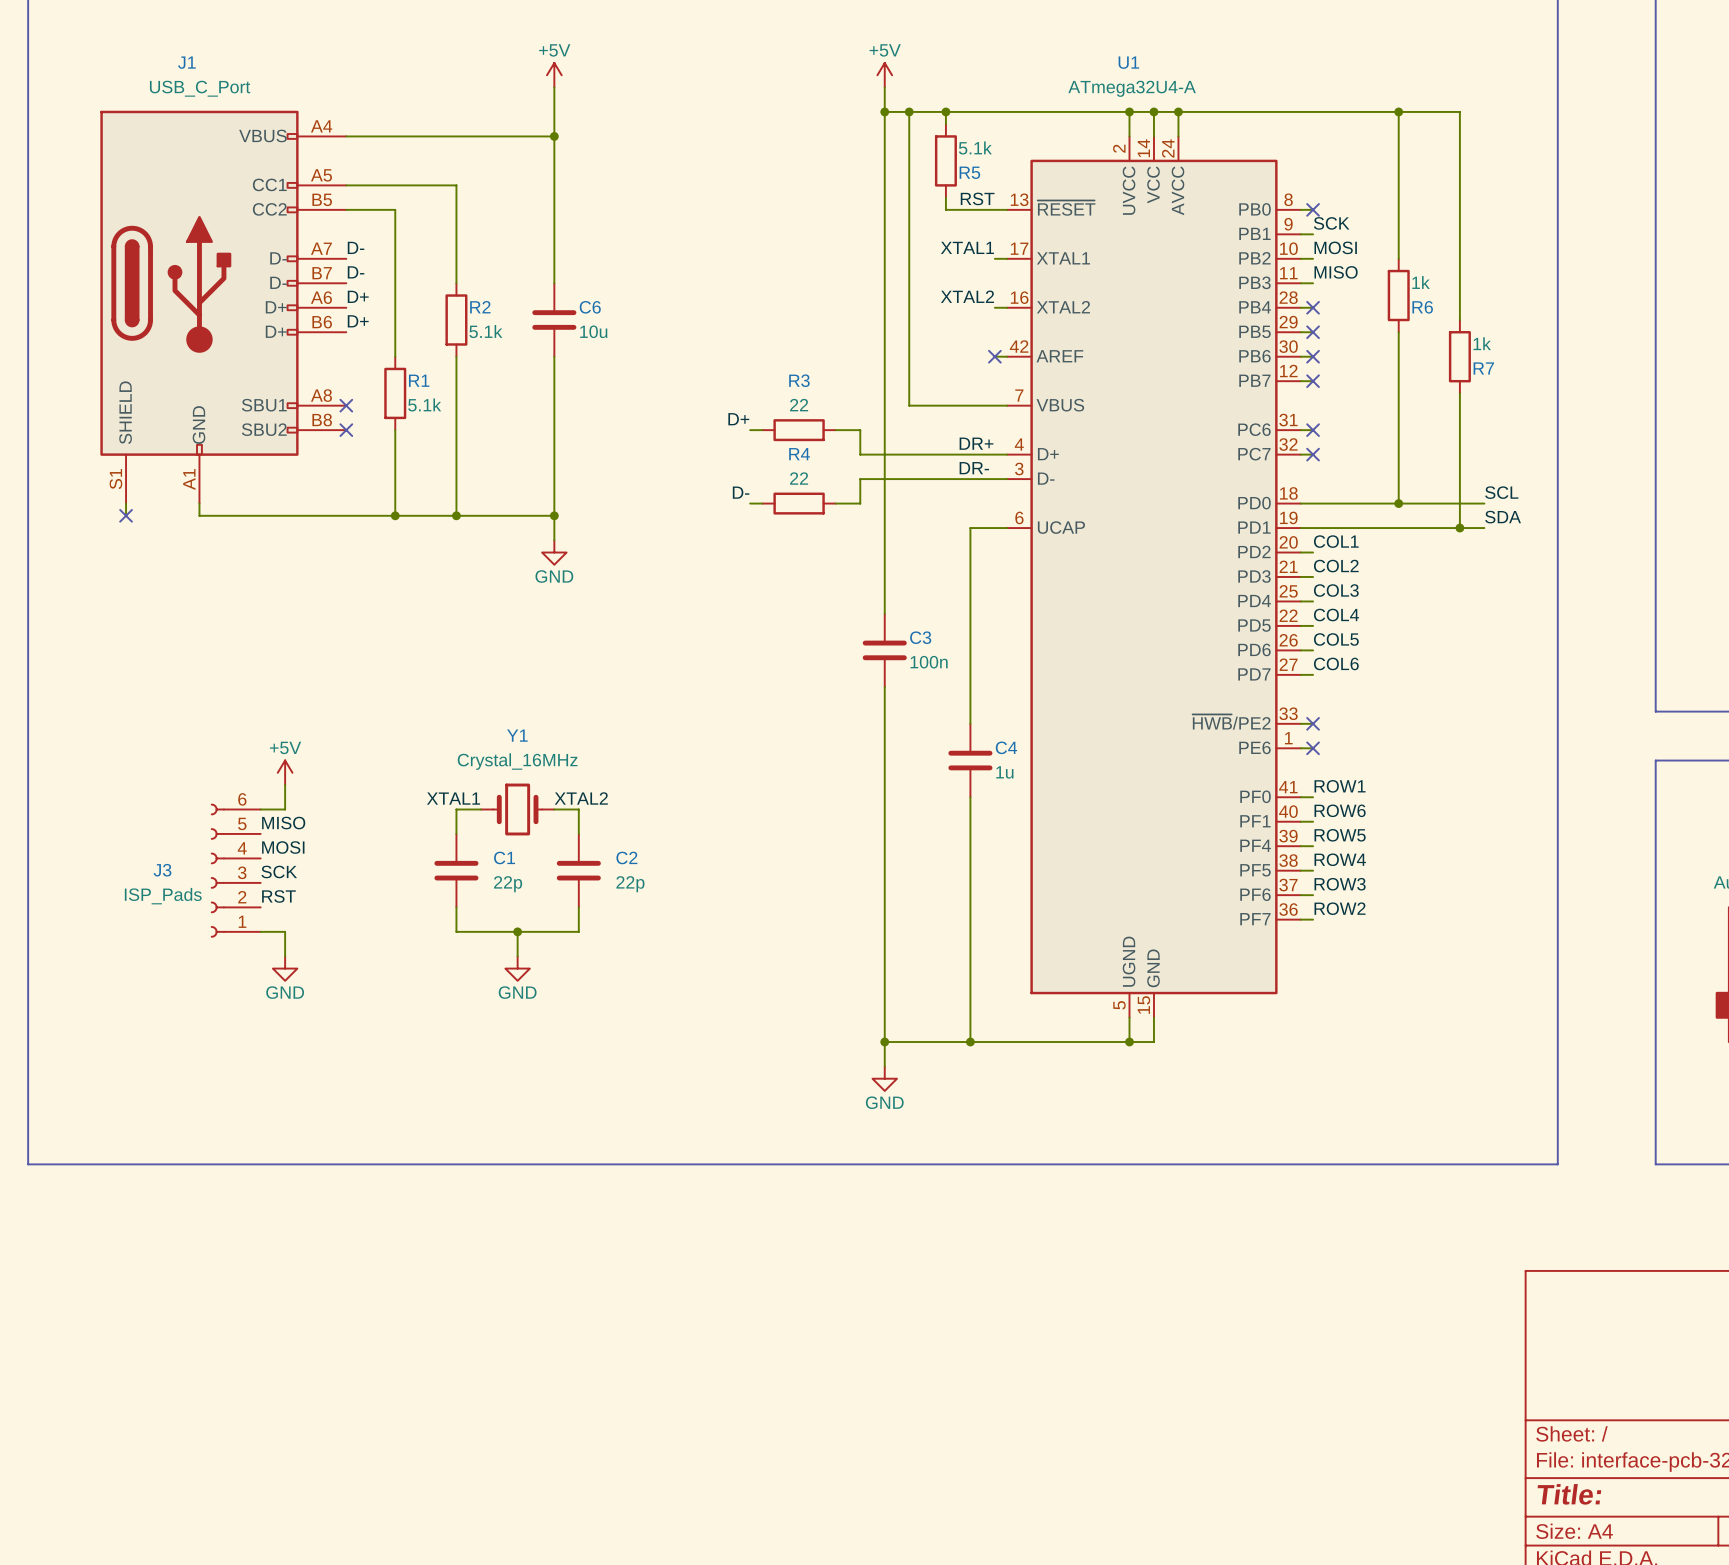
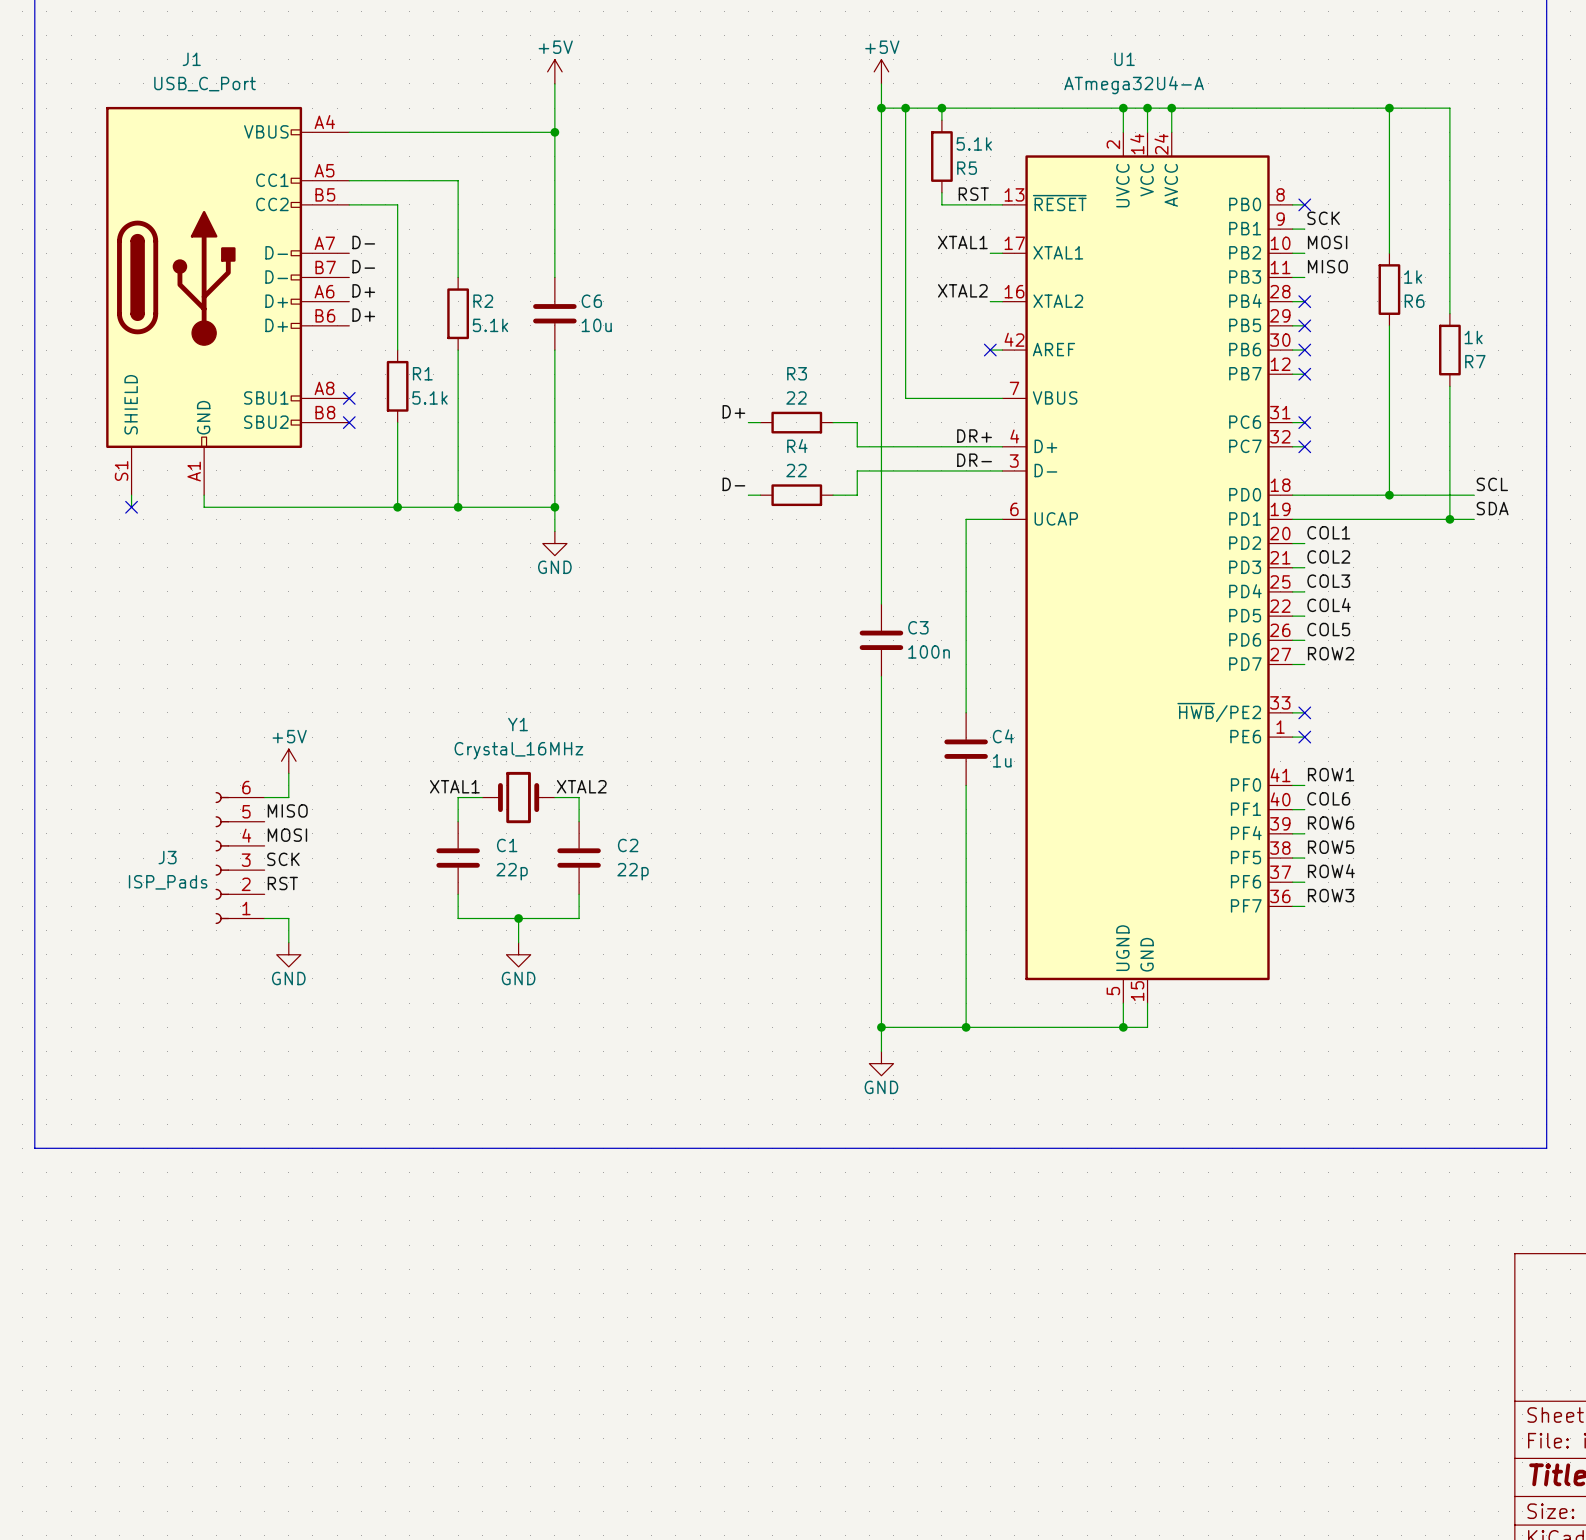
label: COL6 (1336, 663) -> ROW2 (1331, 653)
label: ROW6 (1340, 810) -> COL6 (1328, 798)
label: ROW5 (1340, 835) -> ROW6 (1331, 823)
label: ROW4 (1340, 859) -> ROW5 (1331, 847)
label: ROW3 (1340, 884) -> ROW4 (1331, 871)
label: ROW2 (1340, 908) -> ROW3 (1331, 895)

